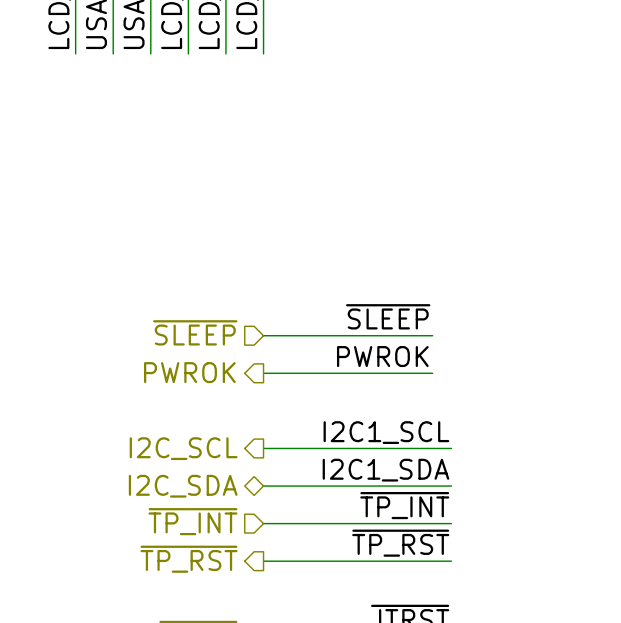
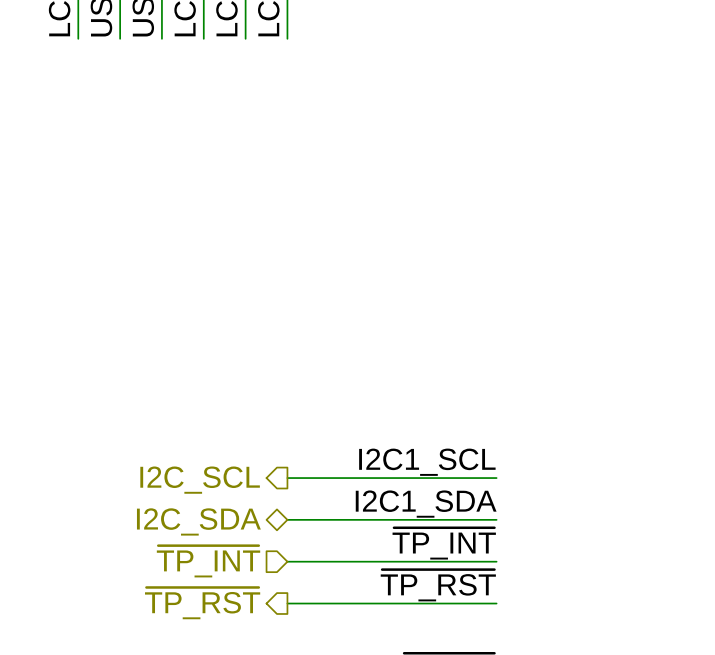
label: ~{SLEEP} (388, 316) -> none
hierarchical label: ~{SLEEP} (195, 332) -> none
wire: (263, 335) (432, 335) -> none
label: PWROK (382, 356) -> none
hierarchical label: PWROK (189, 372) -> none
wire: (263, 373) (432, 373) -> none

